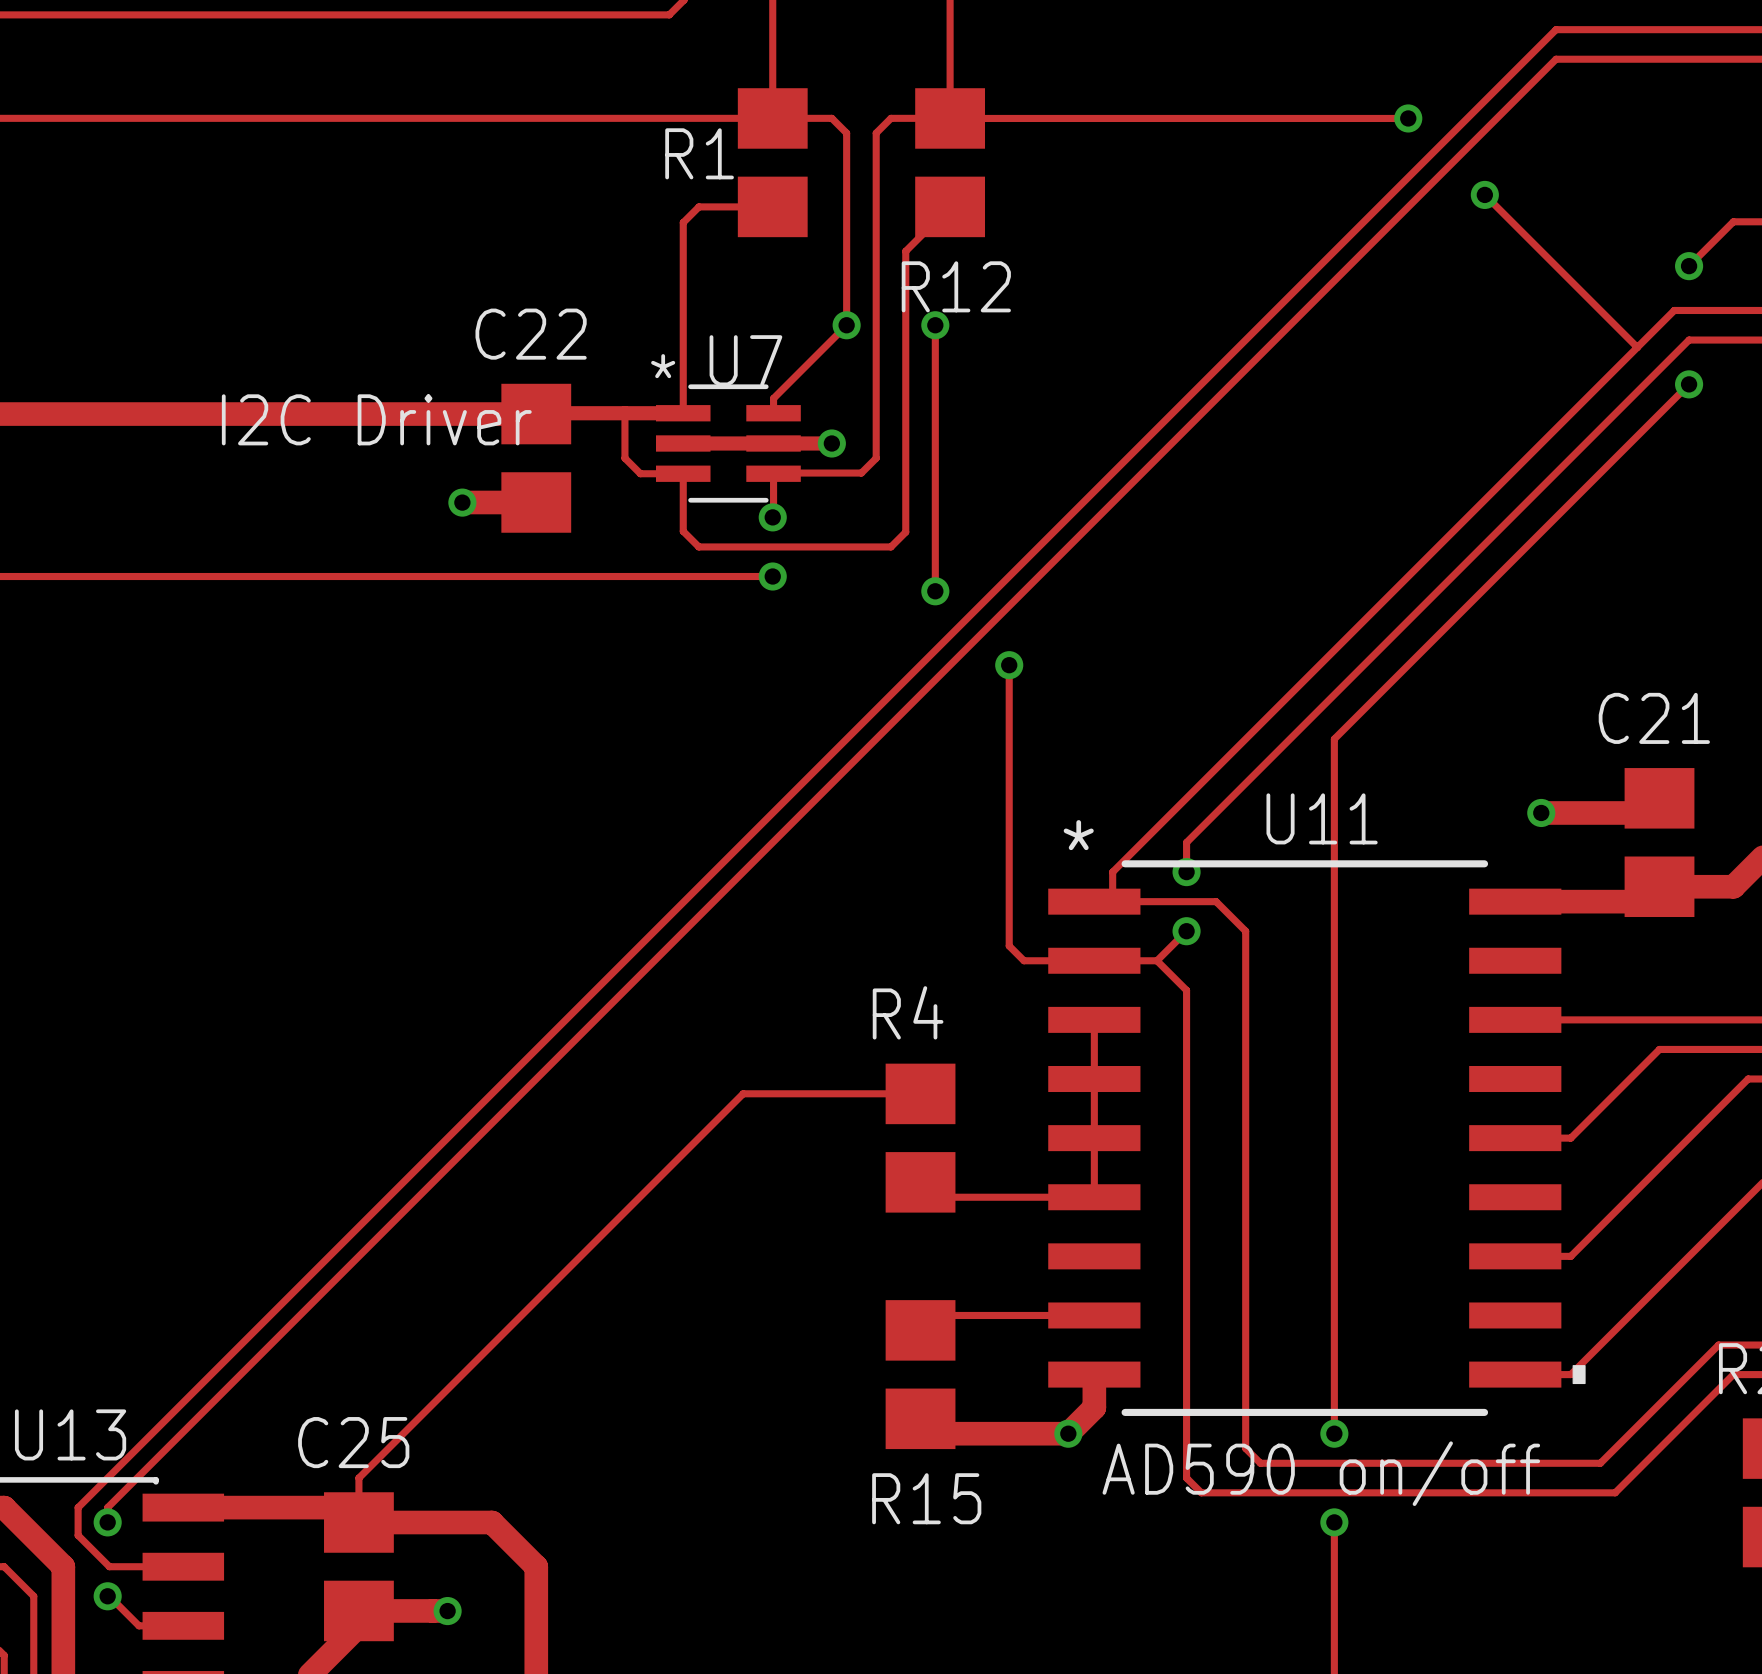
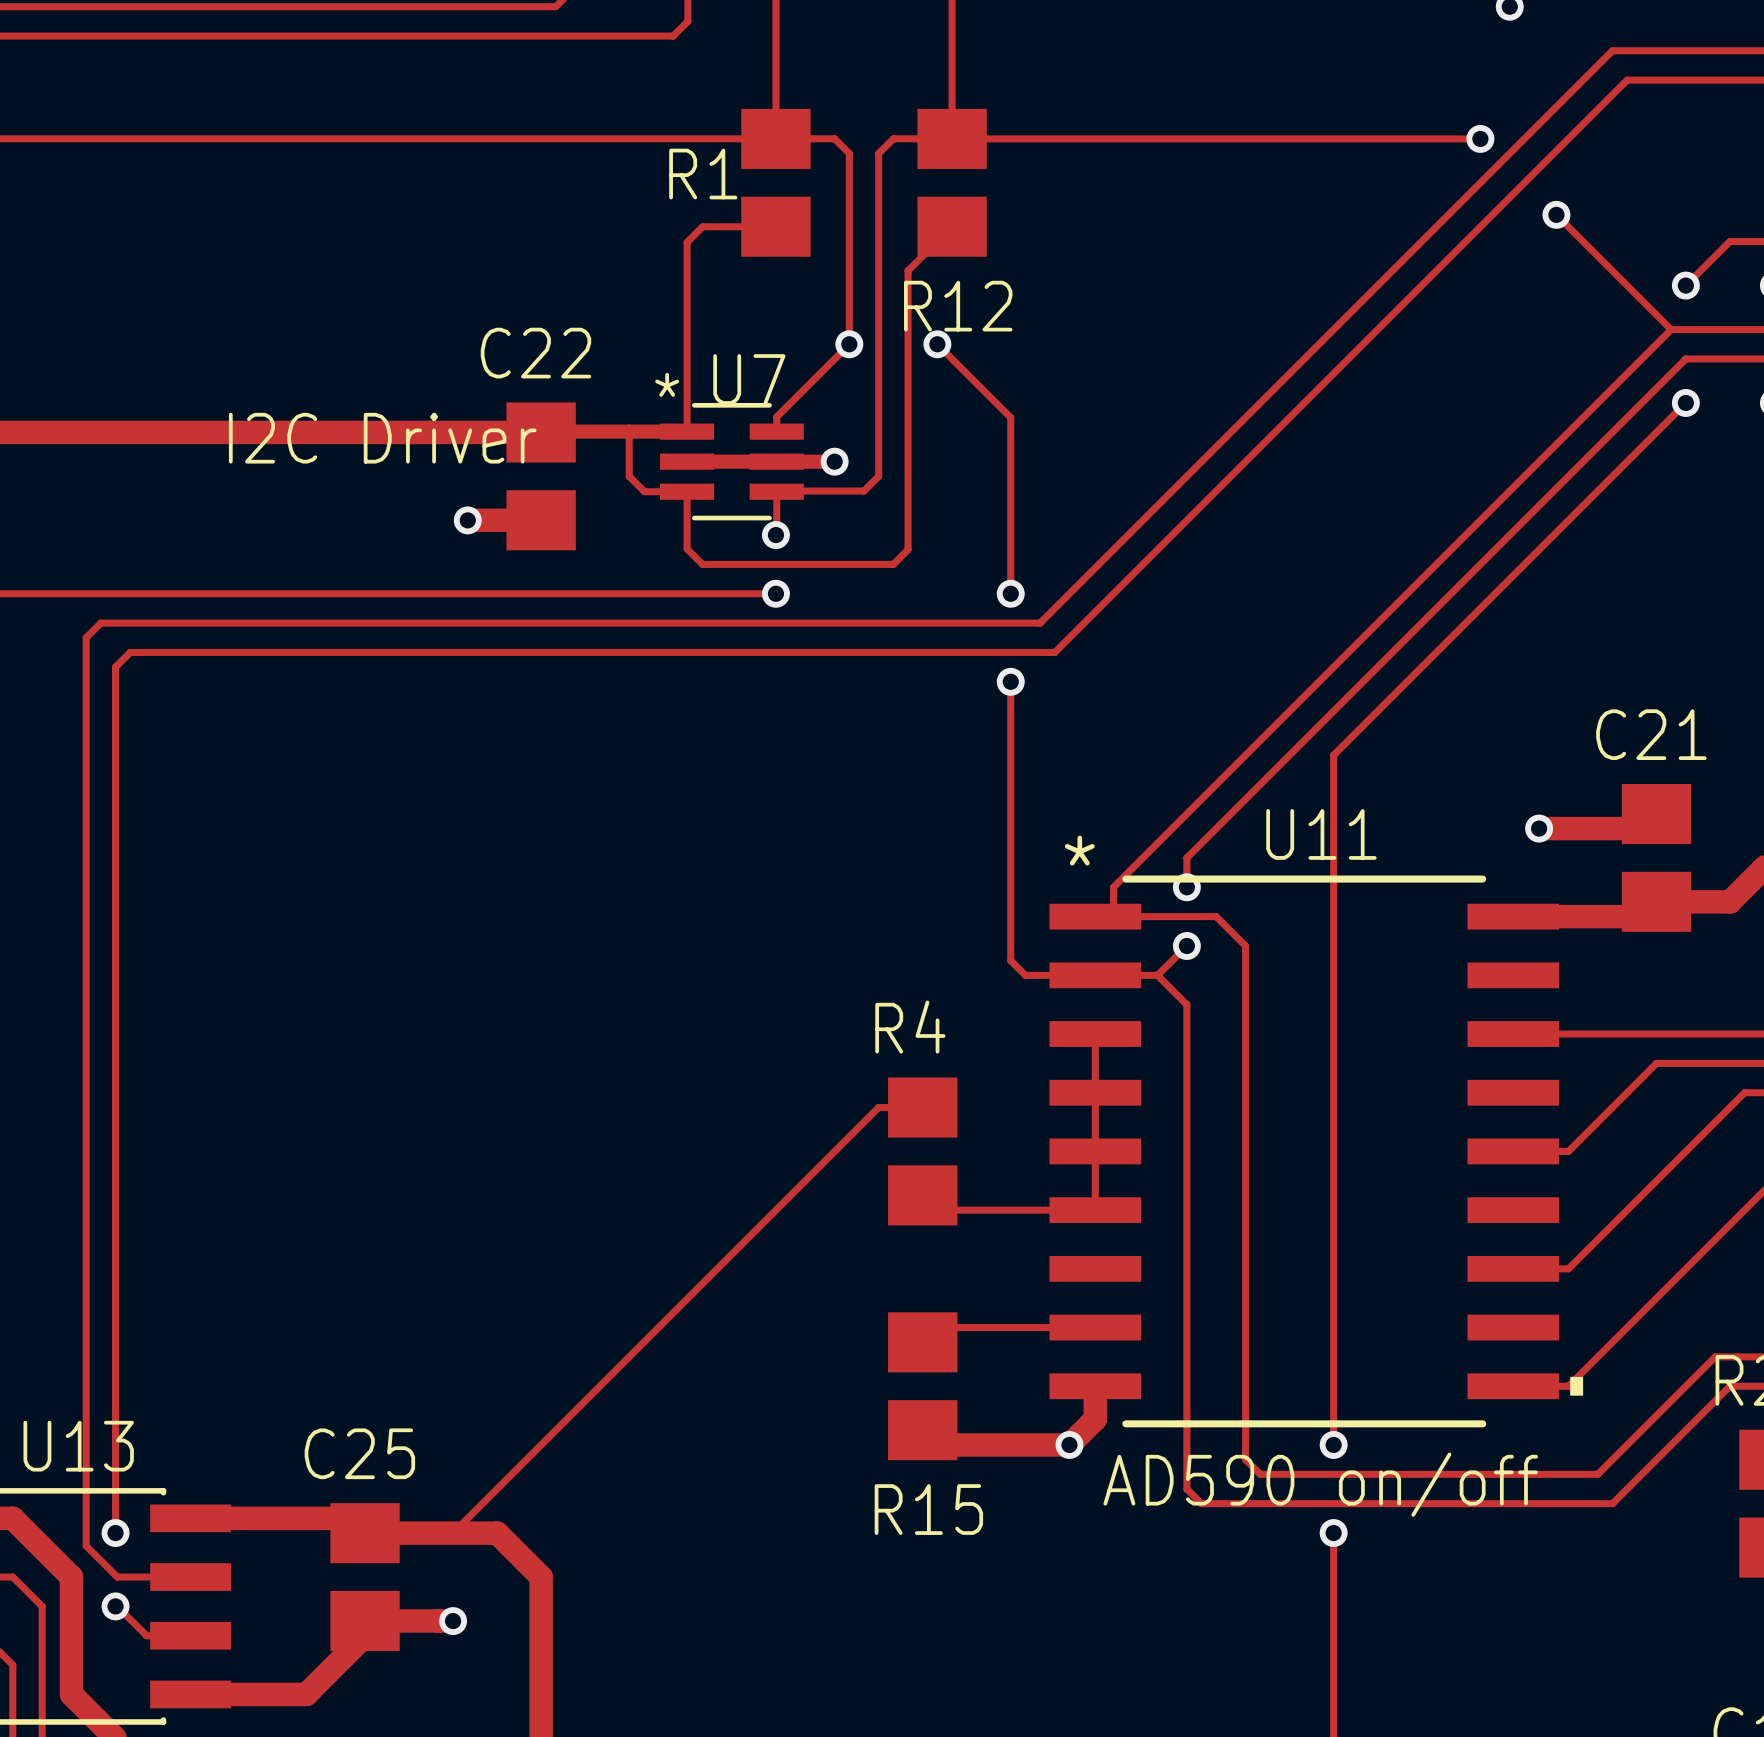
track: (1615, 29) (1556, 29) (78, 1507) -> (1612, 50) (1040, 623) (100, 623) (86, 637) (86, 1518)
track: (1629, 59) (1556, 59) (107, 1507) -> (1627, 80) (1054, 652) (130, 652) (115, 667) (115, 1518)
track: none -> (1407, 138) (1480, 138)
via: (1408, 118) -> none
via: none -> (1480, 138)
track: (1484, 194) (1637, 347) -> none
via: (1484, 194) -> none
track: none -> (1556, 214) (1671, 329)
via: none -> (1556, 214)
track: (935, 325) (935, 591) -> (937, 344) (1010, 417) (1010, 593)
via position: (935, 591) -> (1010, 593)
track: (920, 1093) (743, 1093) (358, 1478) (358, 1522) -> (922, 1107) (878, 1107) (452, 1533) (365, 1533)

